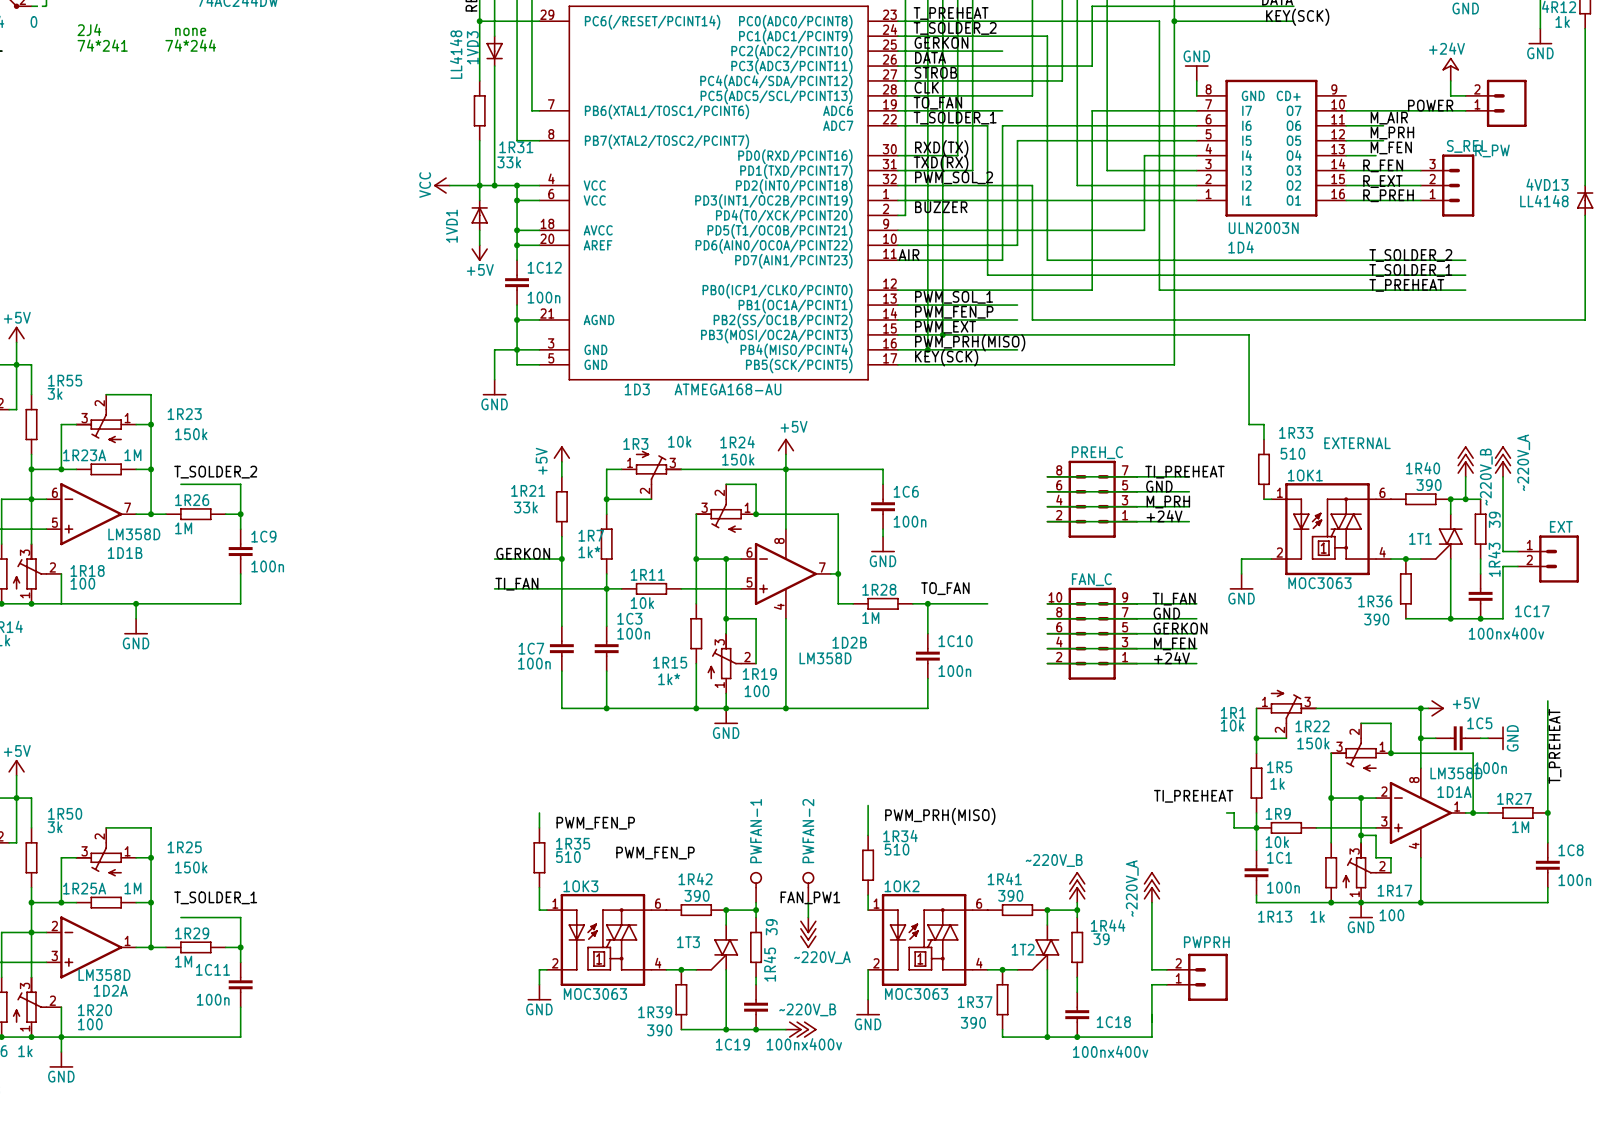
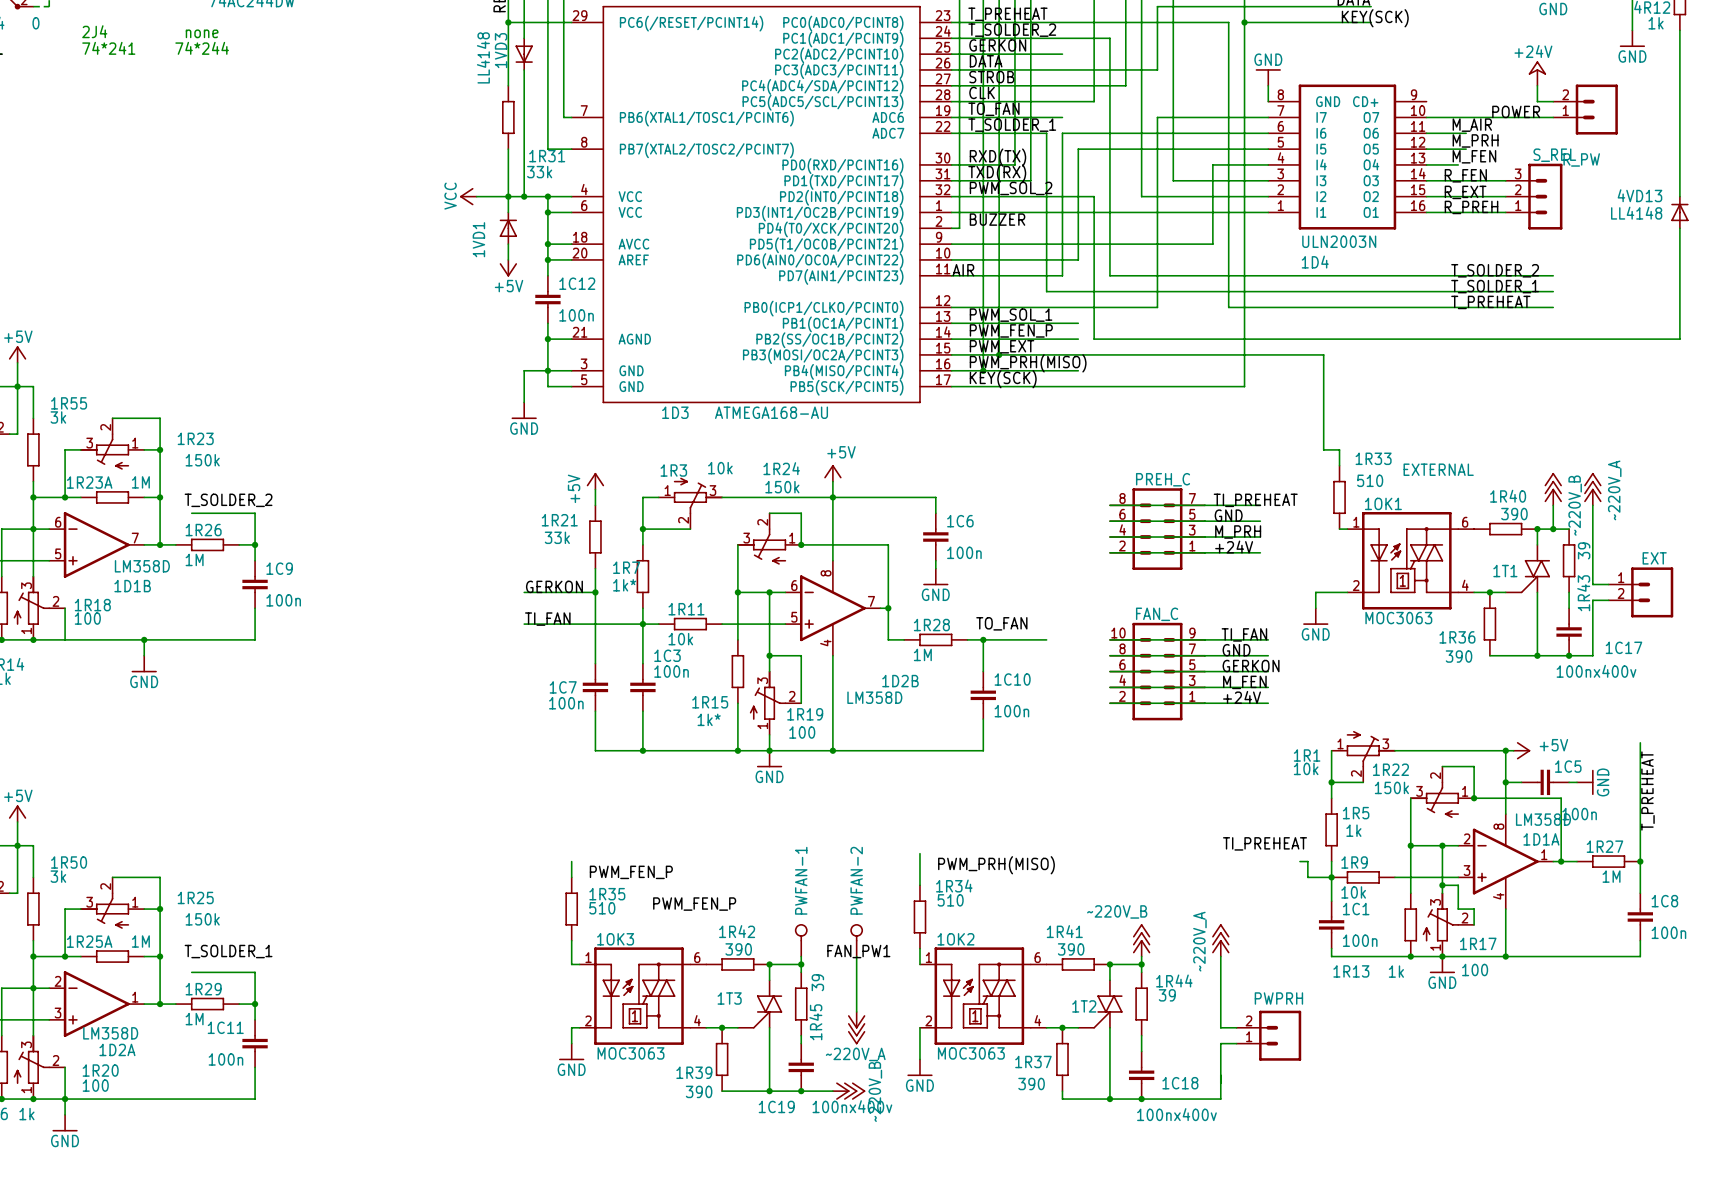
power symbol position: ~220V_A (808, 932) -> ~220V_A (856, 1028)
power symbol text position: ~220V_A (822, 957) -> ~220V_A (855, 1054)
power symbol text rotation: 0° (807, 1009) -> 90° counterclockwise (875, 1091)

